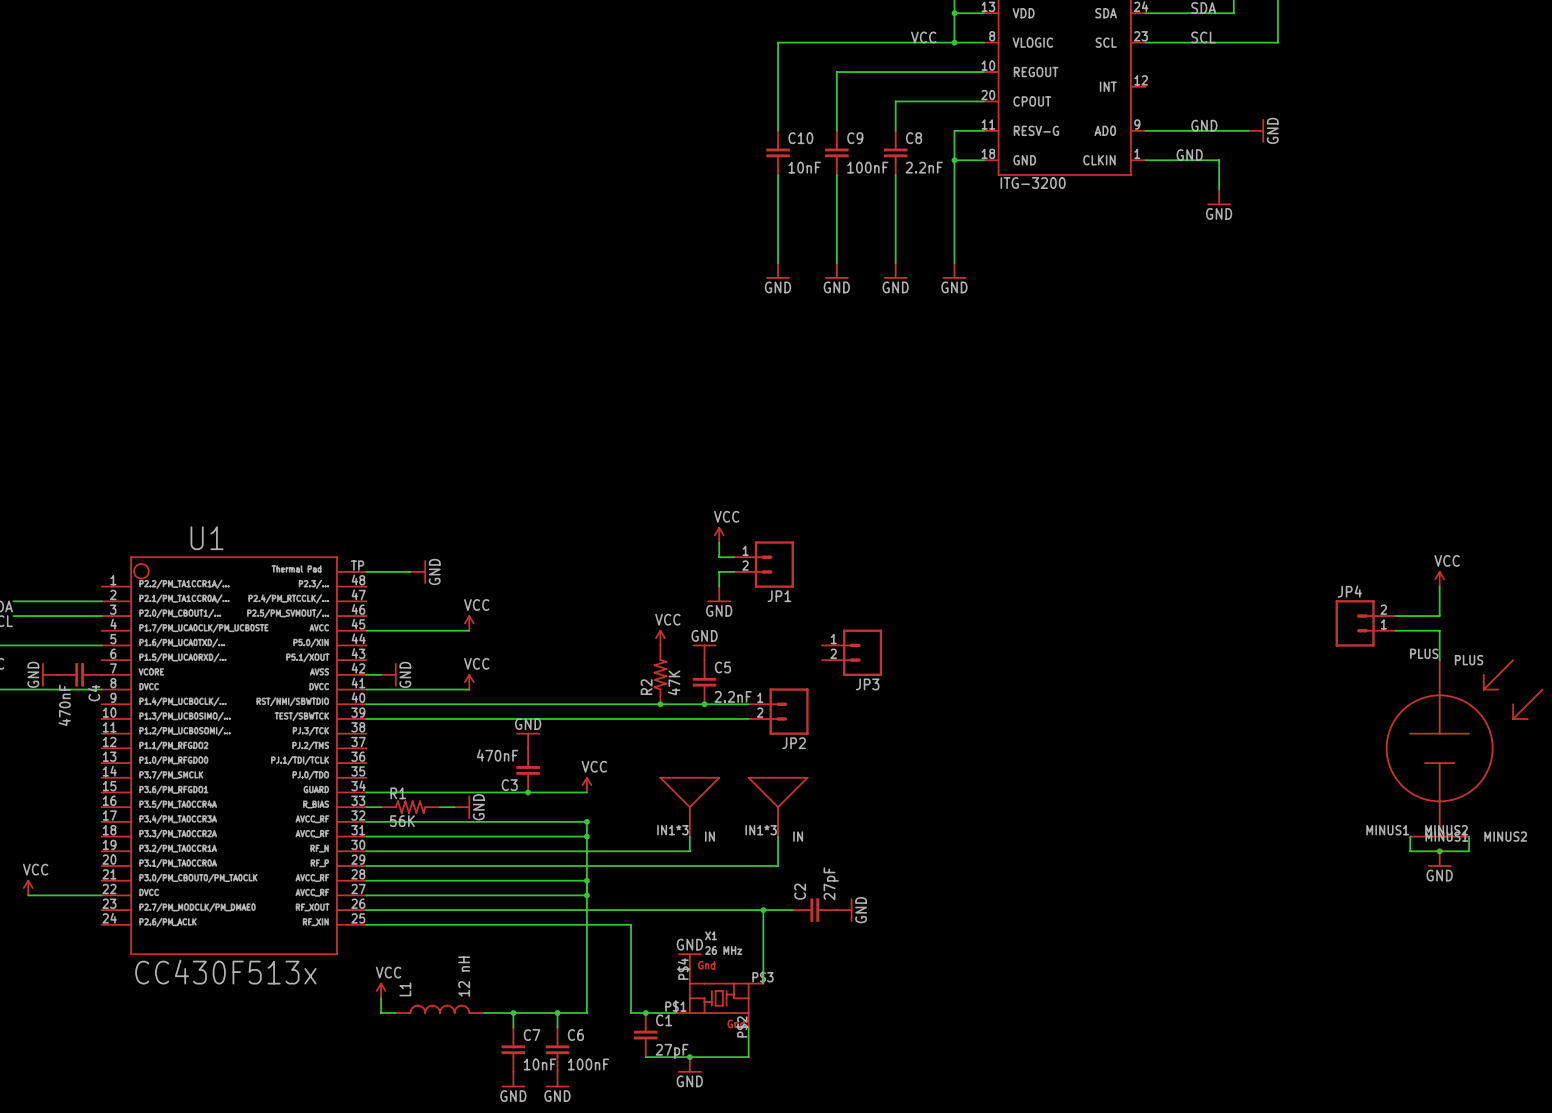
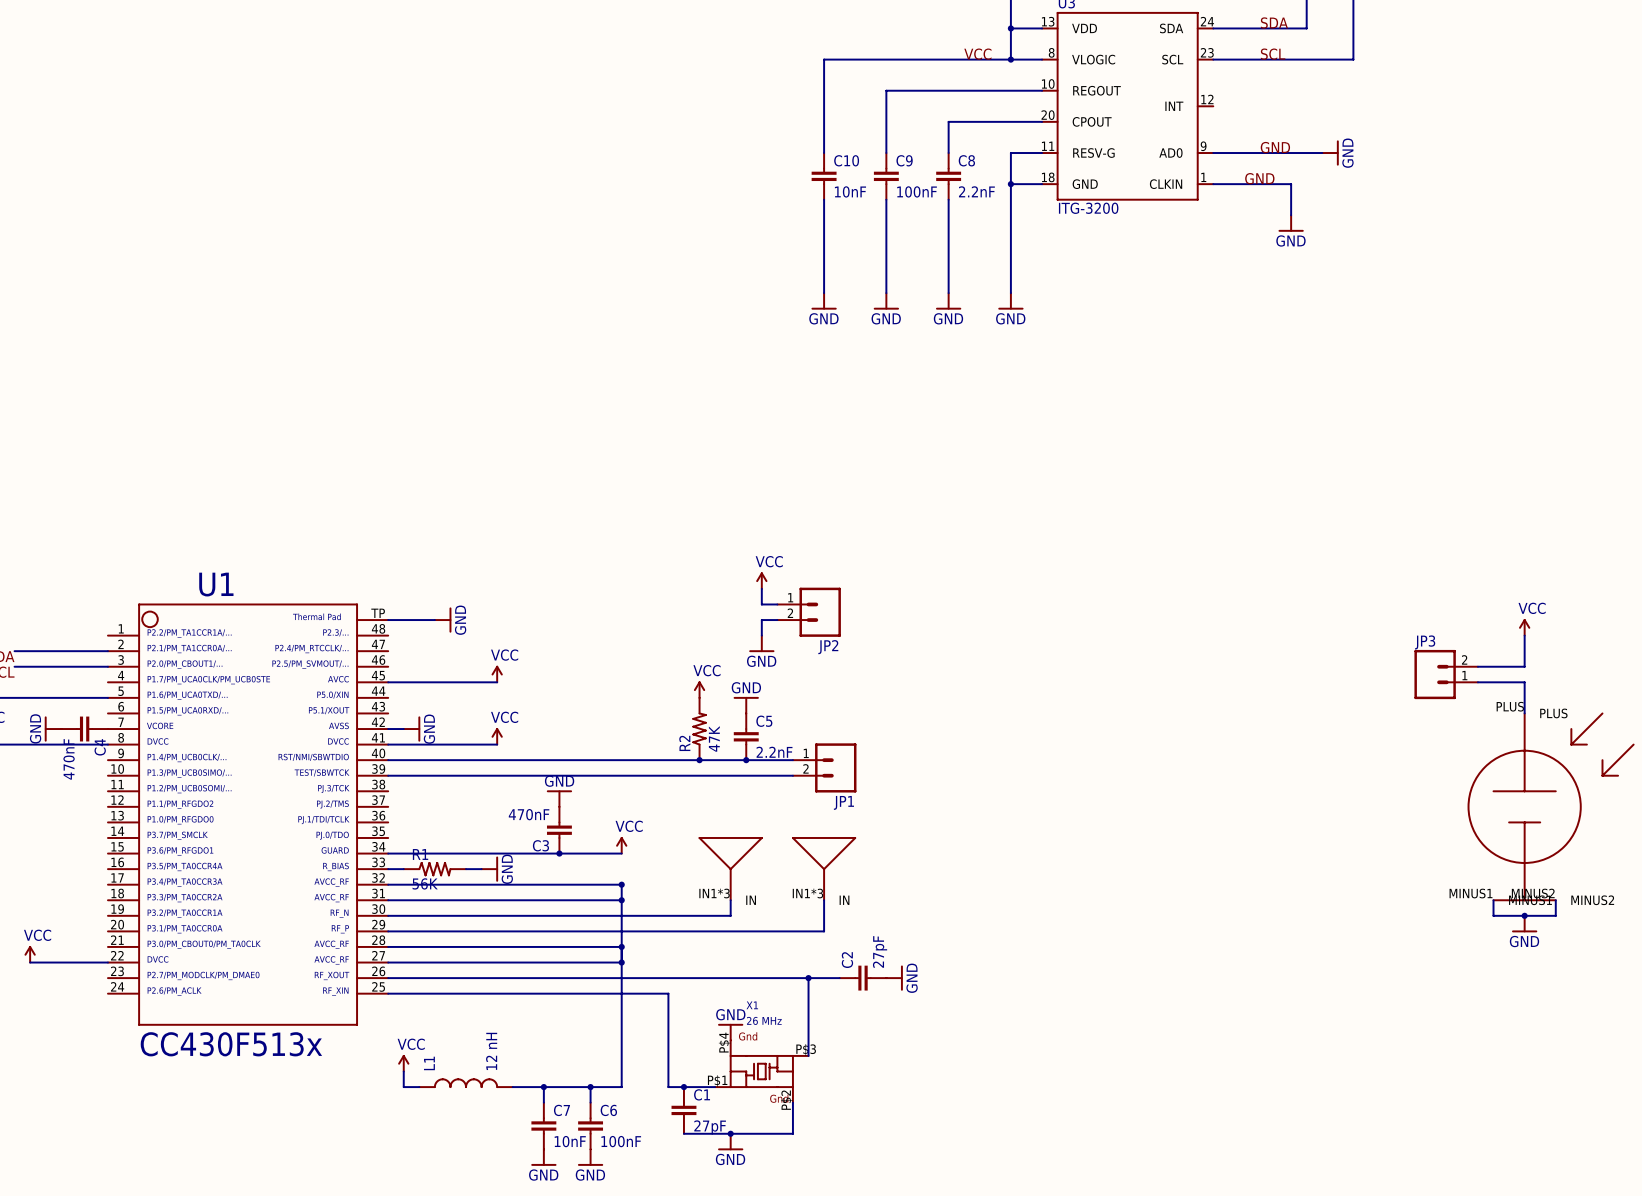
JP4 name: JP4 (1349, 591) -> JP3 (1425, 642)
JP1 name: JP1 (779, 596) -> JP2 (828, 647)
JP3: (852, 652) -> none
JP2 name: JP2 (794, 743) -> JP1 (843, 802)

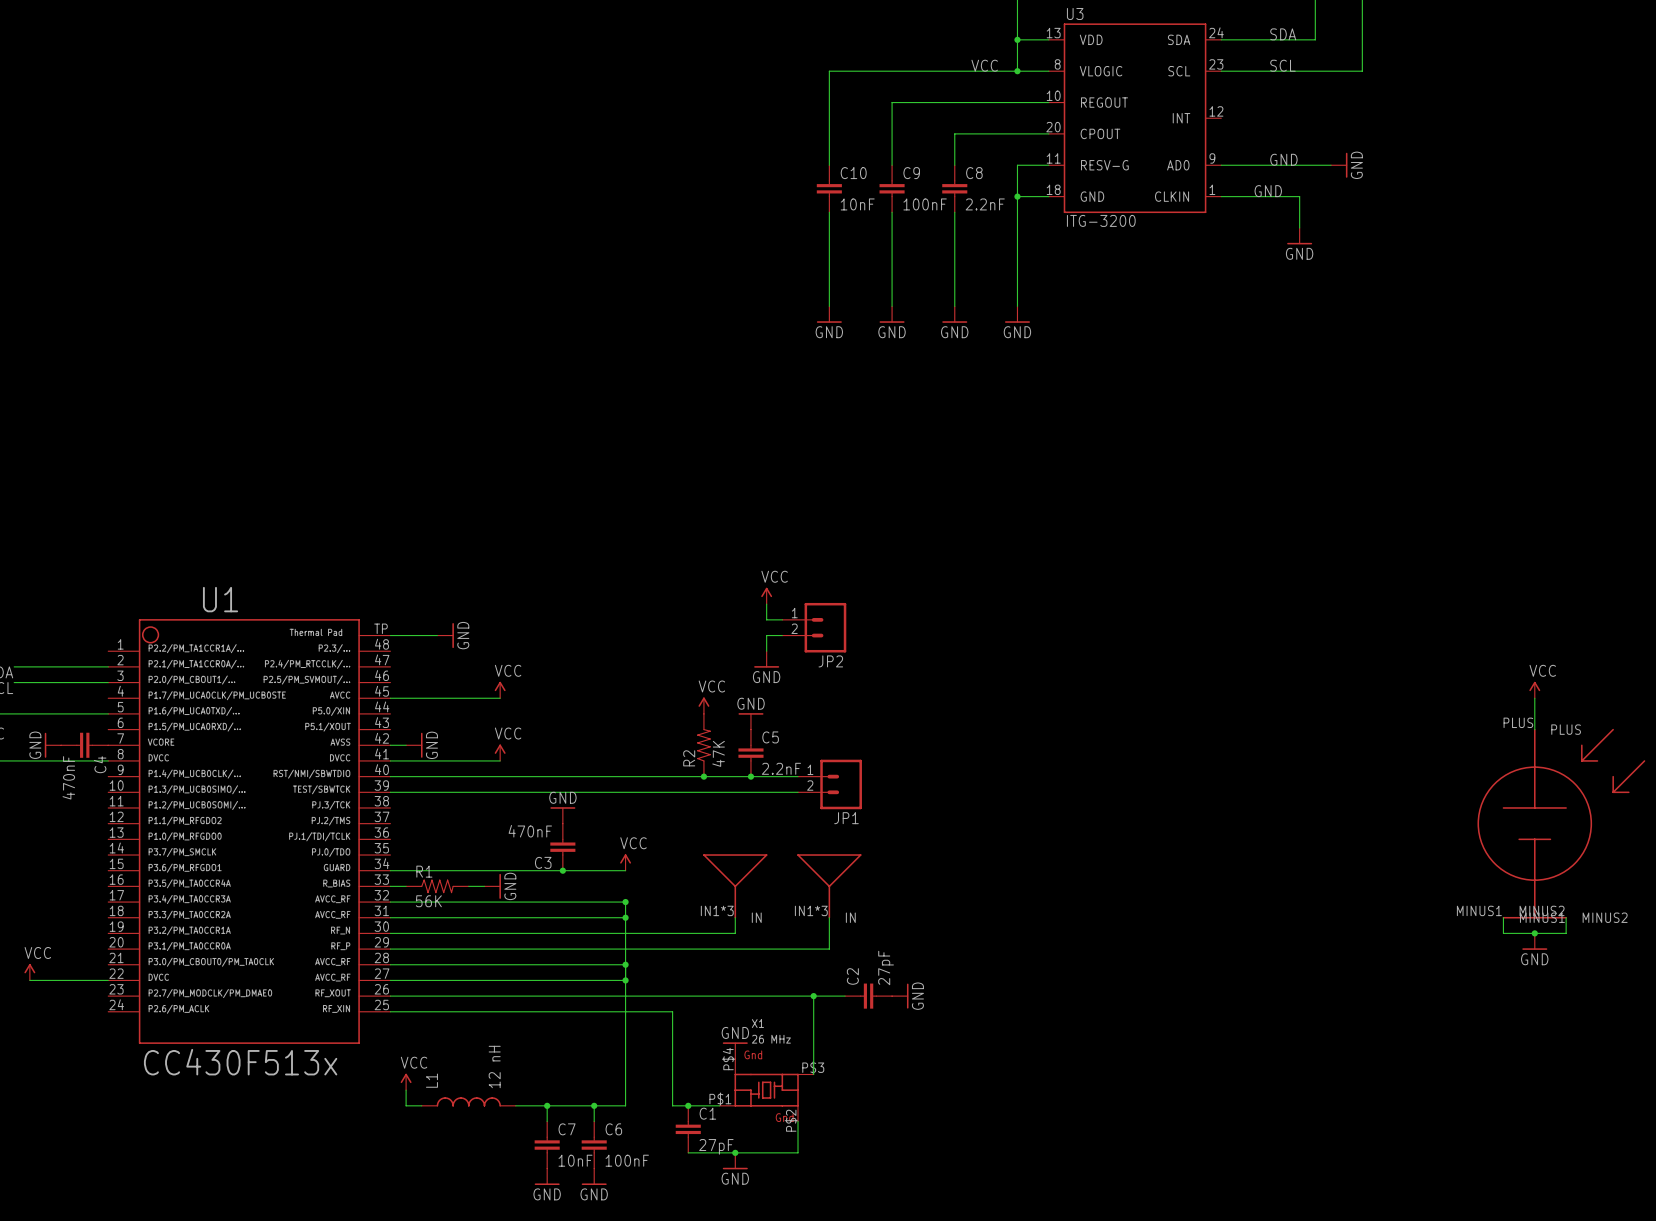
power symbol position: VCC (1524, 627) -> VCC (1534, 690)
wire: (1524, 635) (1524, 666) (1477, 666) -> none
JP3: (1446, 674) -> none
wire: (1477, 682) (1524, 682) -> none

